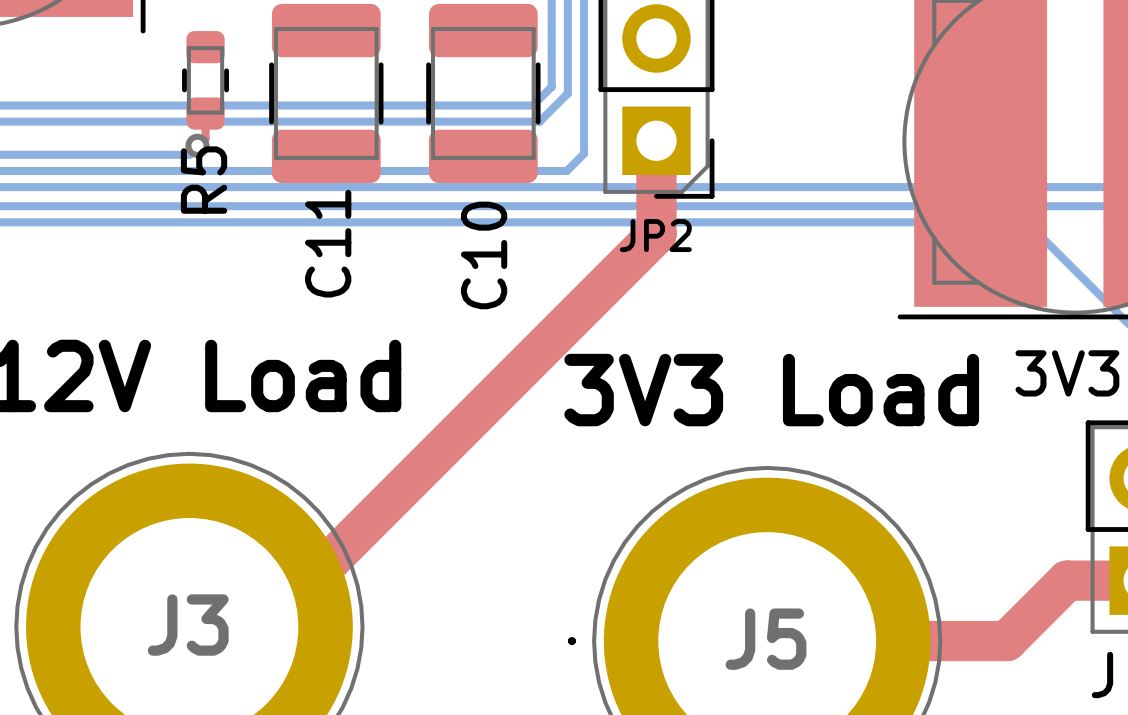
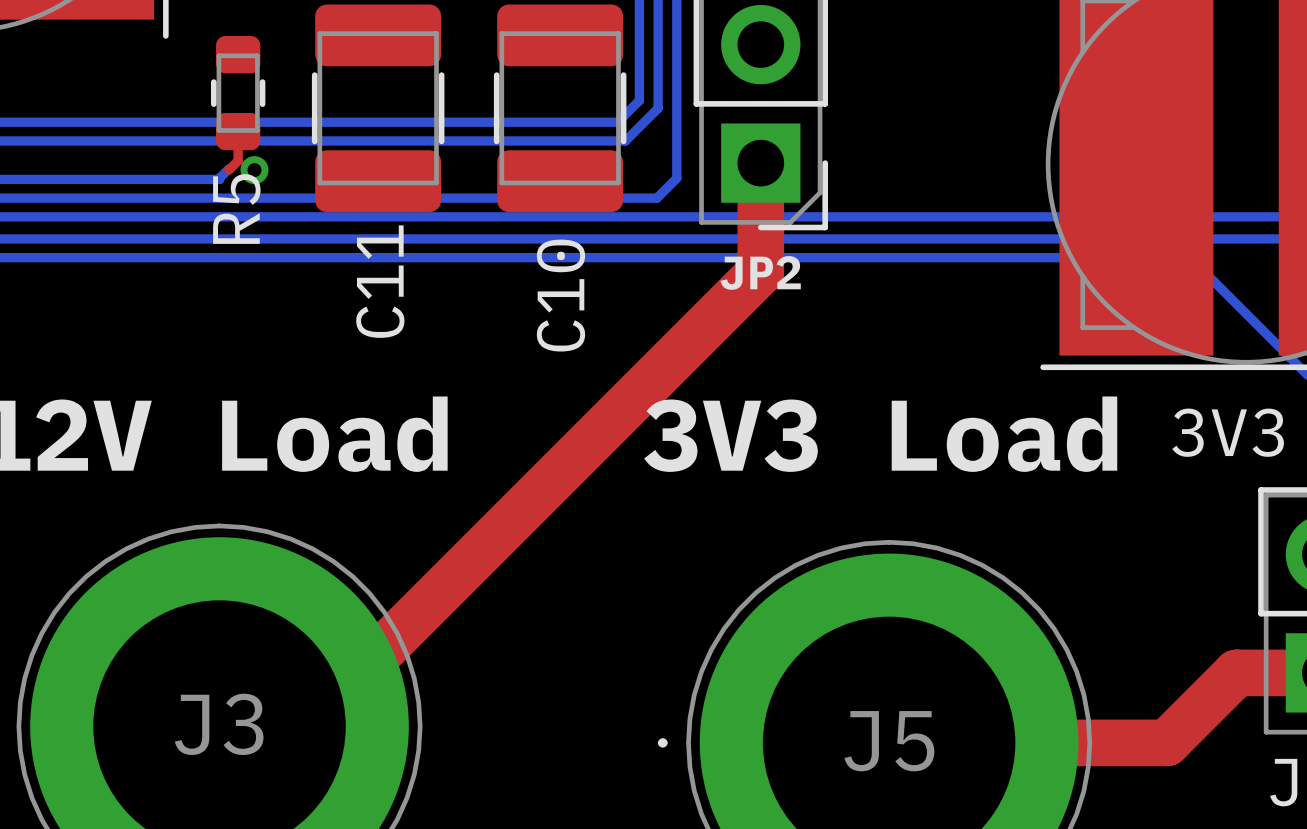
via position: (197, 145) -> (254, 170)
text position: 3V3 Load (771, 390) -> 3V3 Load (880, 434)

